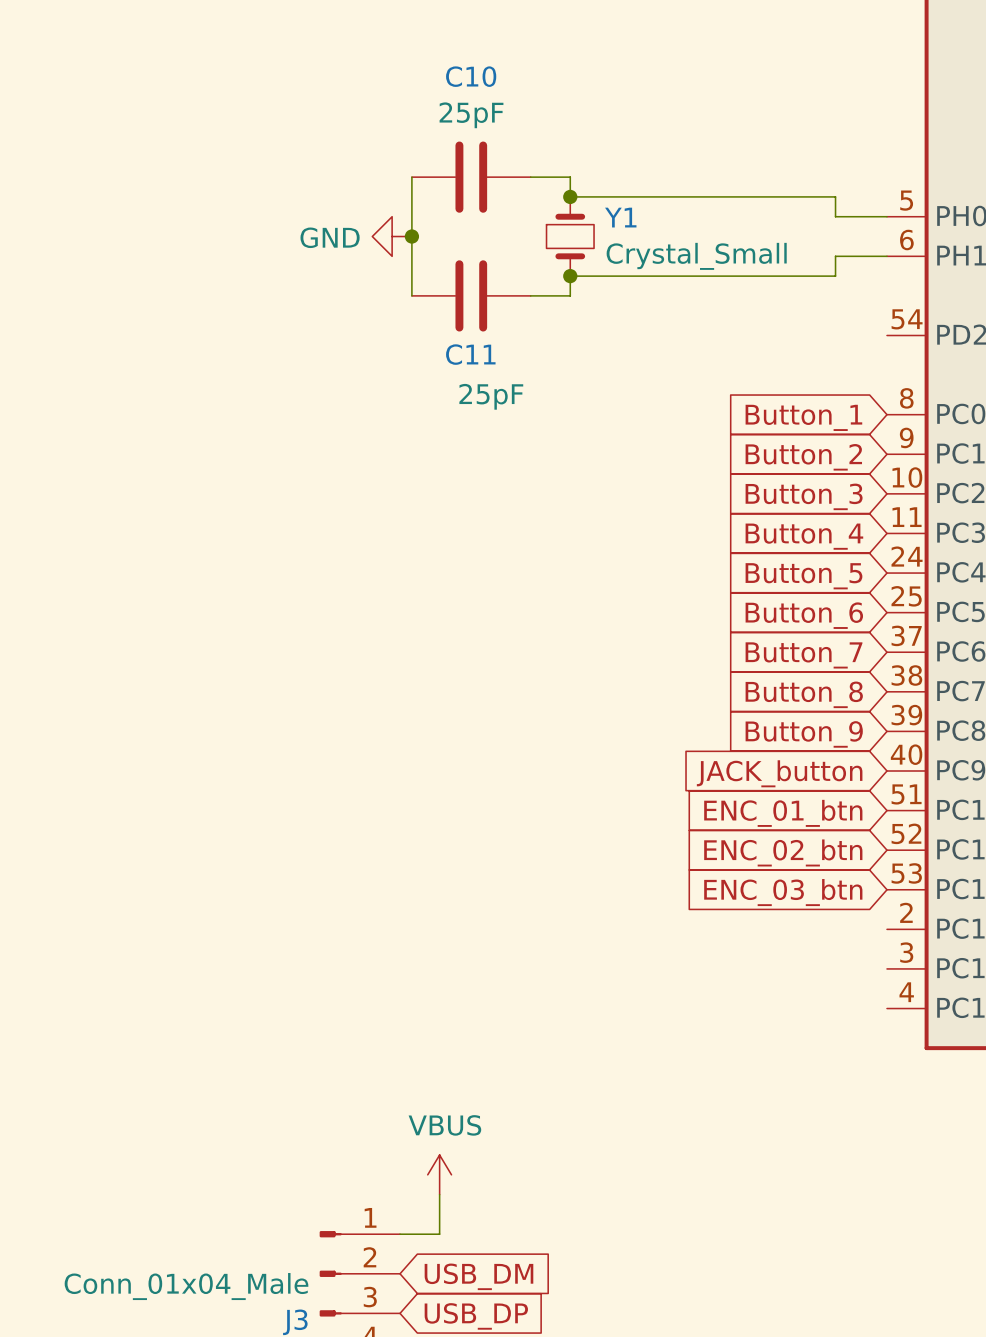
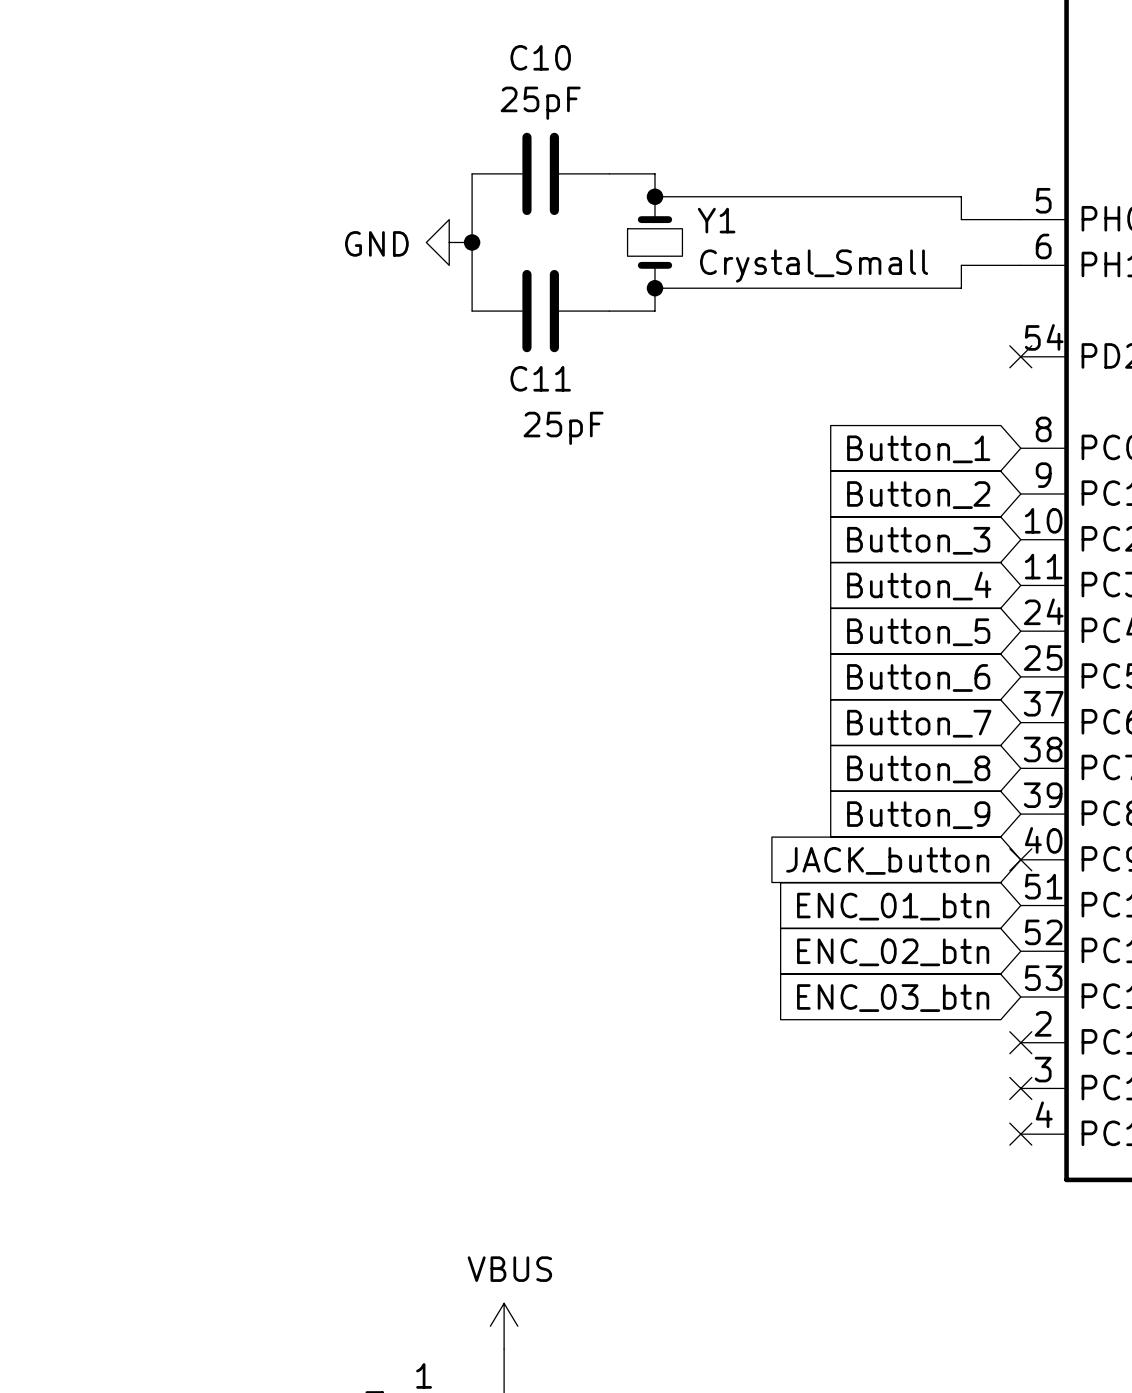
no-connect mark: none -> (1020, 356)
no-connect mark: none -> (1020, 859)
no-connect mark: none -> (1020, 1042)
no-connect mark: none -> (1020, 1088)
no-connect mark: none -> (1020, 1134)

